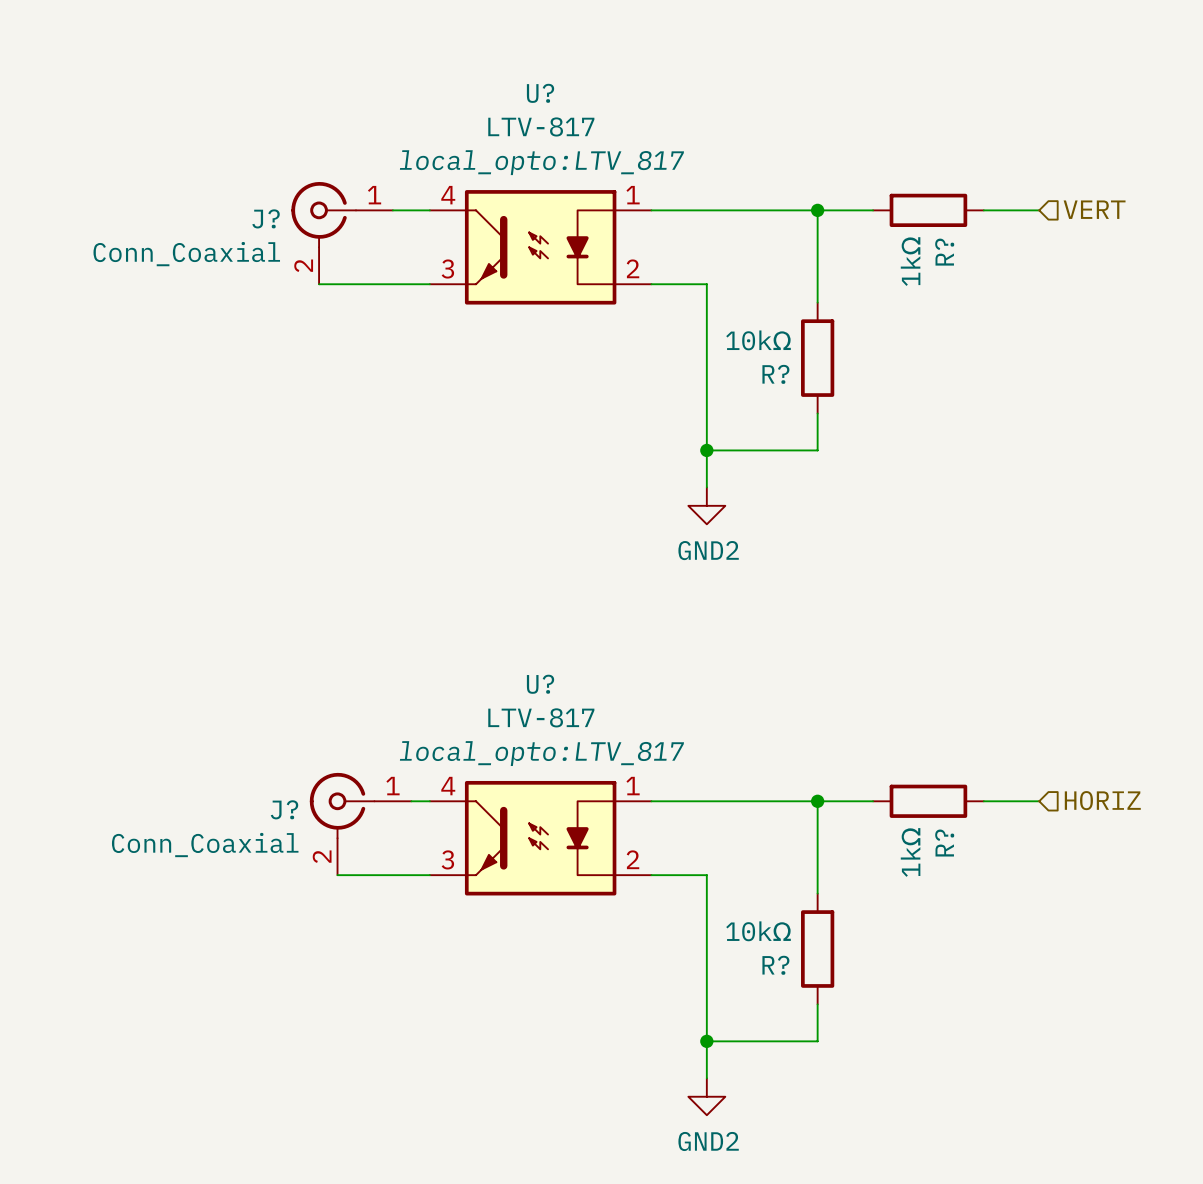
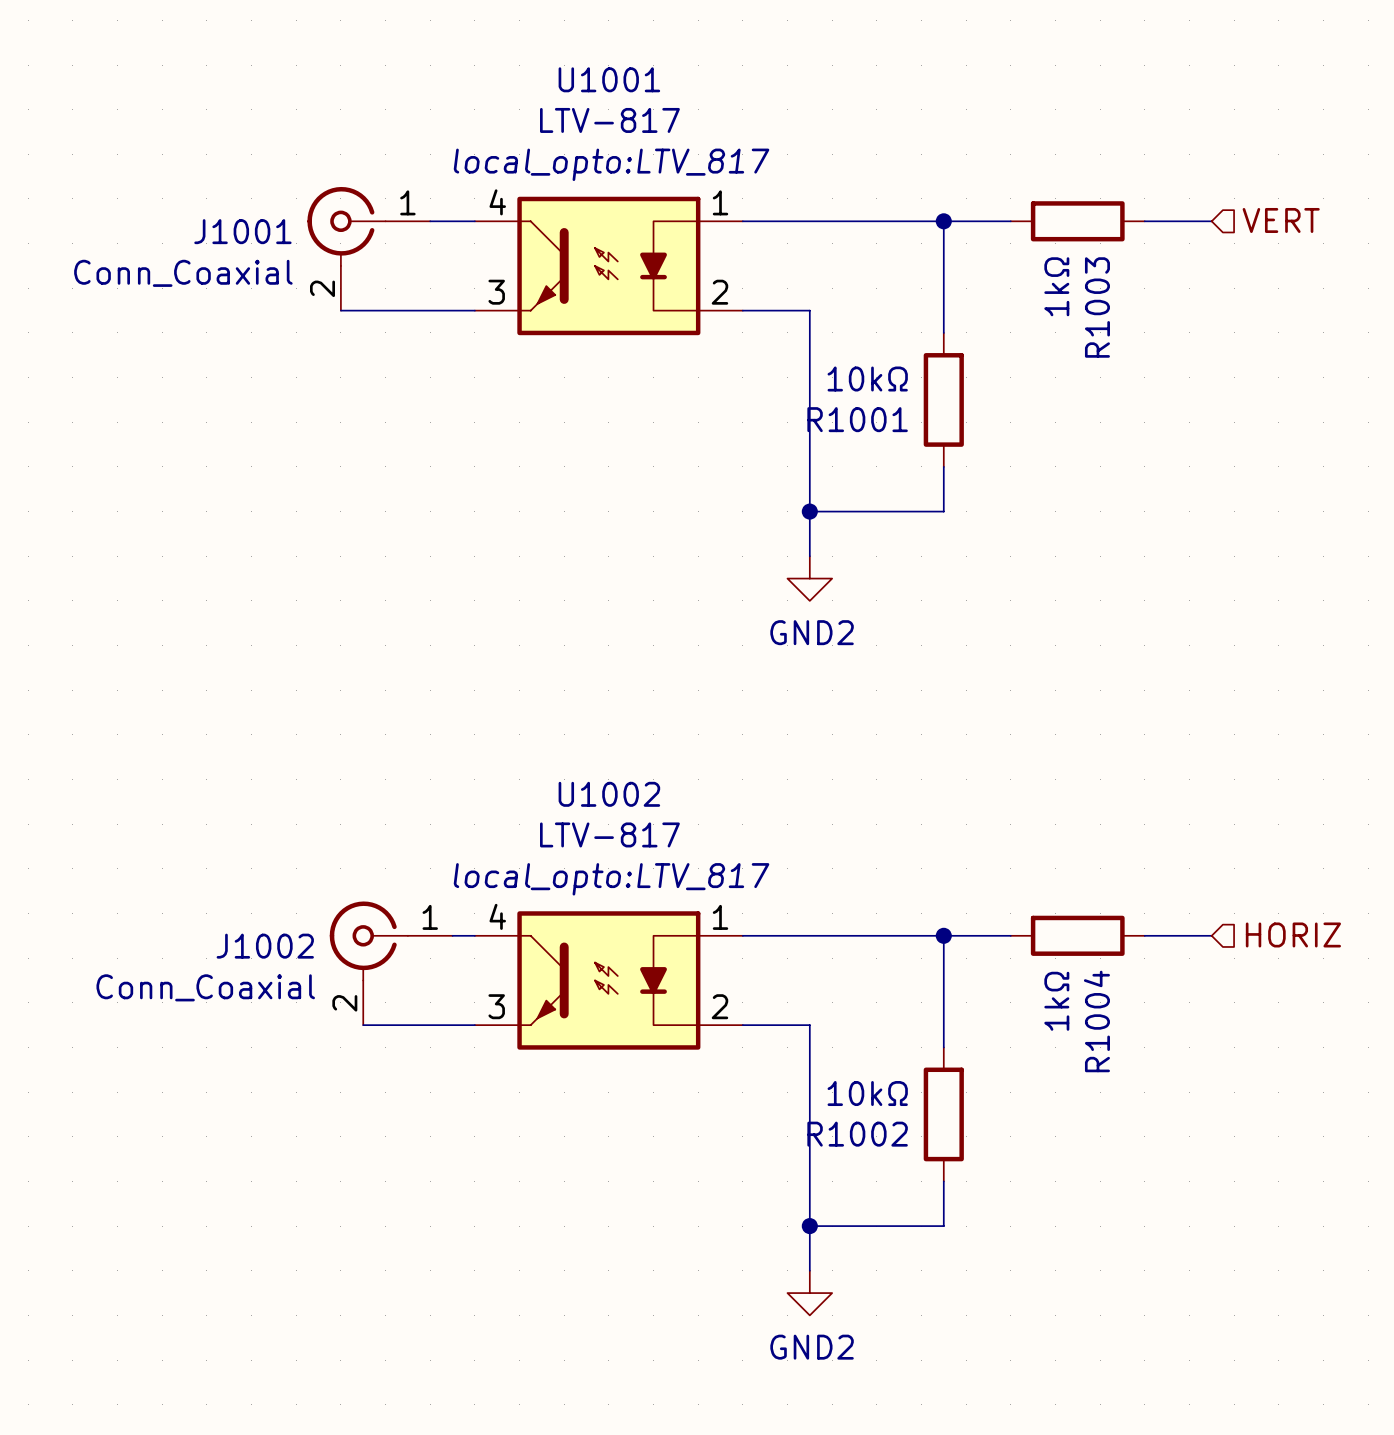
U? name: U? (540, 93) -> U1001 (609, 79)
J? name: J? (266, 218) -> J1001 (242, 231)
R? name: R? (944, 252) -> R1003 (1097, 307)
R? name: R? (775, 374) -> R1001 (857, 419)
U? name: U? (540, 684) -> U1002 (609, 794)
J? name: J? (284, 809) -> J1002 (265, 946)
R? name: R? (944, 843) -> R1004 (1096, 1021)
R? name: R? (775, 965) -> R1002 (857, 1134)

